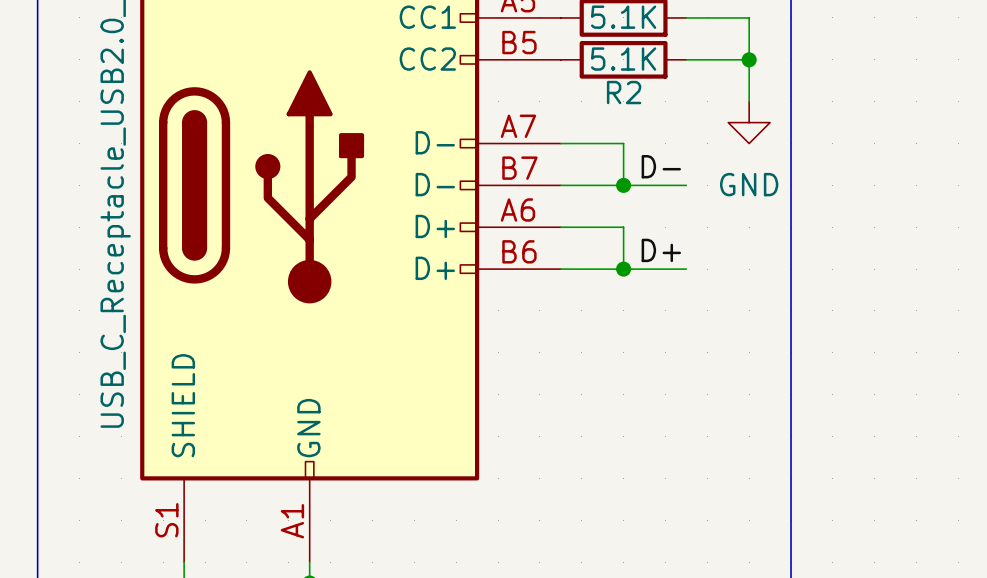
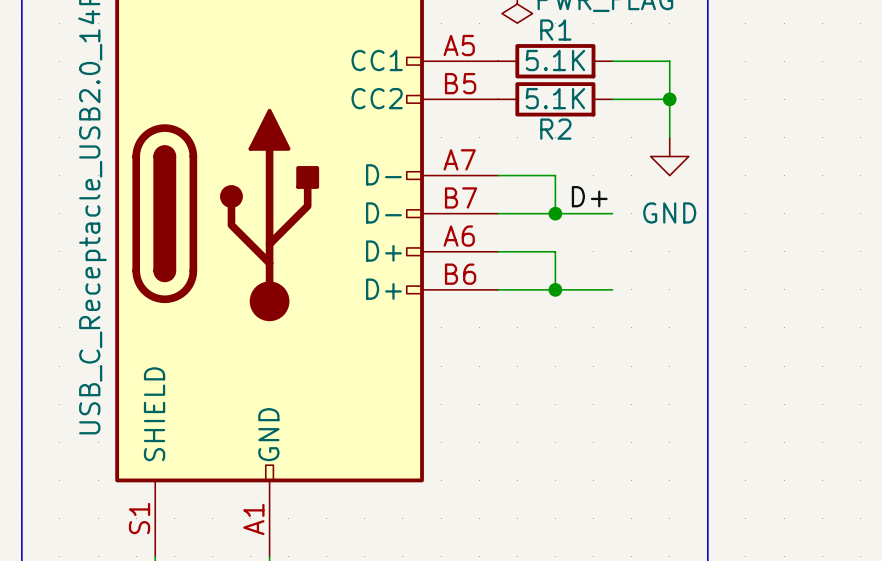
label: D- (661, 166) -> D+ (589, 196)
label: D+ (661, 250) -> none

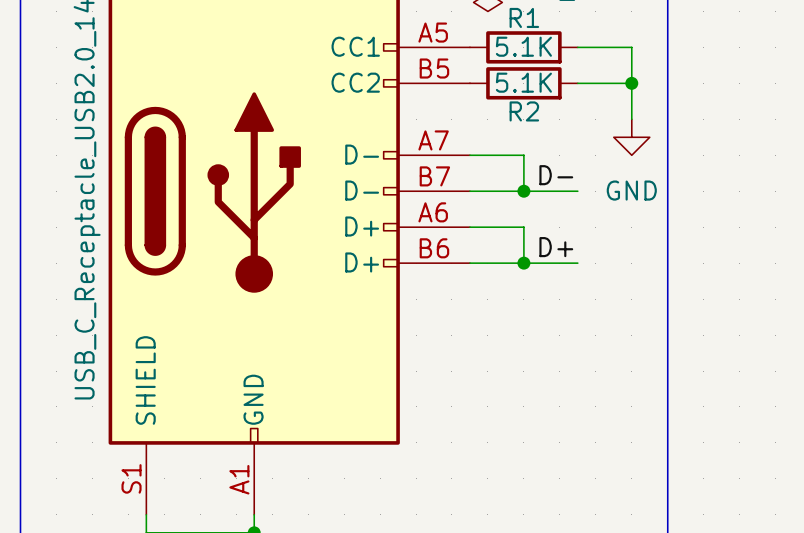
label: D+ (589, 196) -> D- (556, 175)
label: none -> D+ (556, 247)

